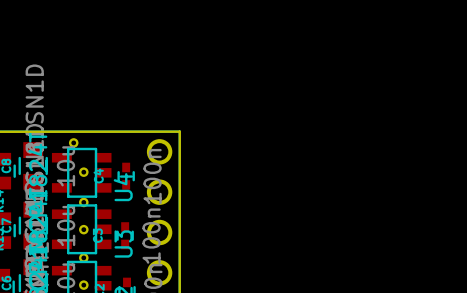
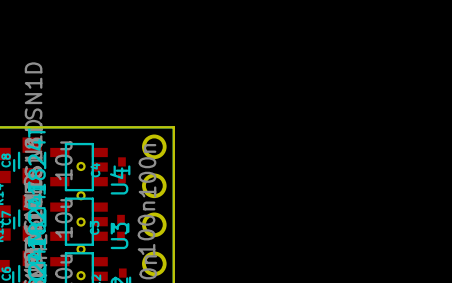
part: (73, 142) -> none

